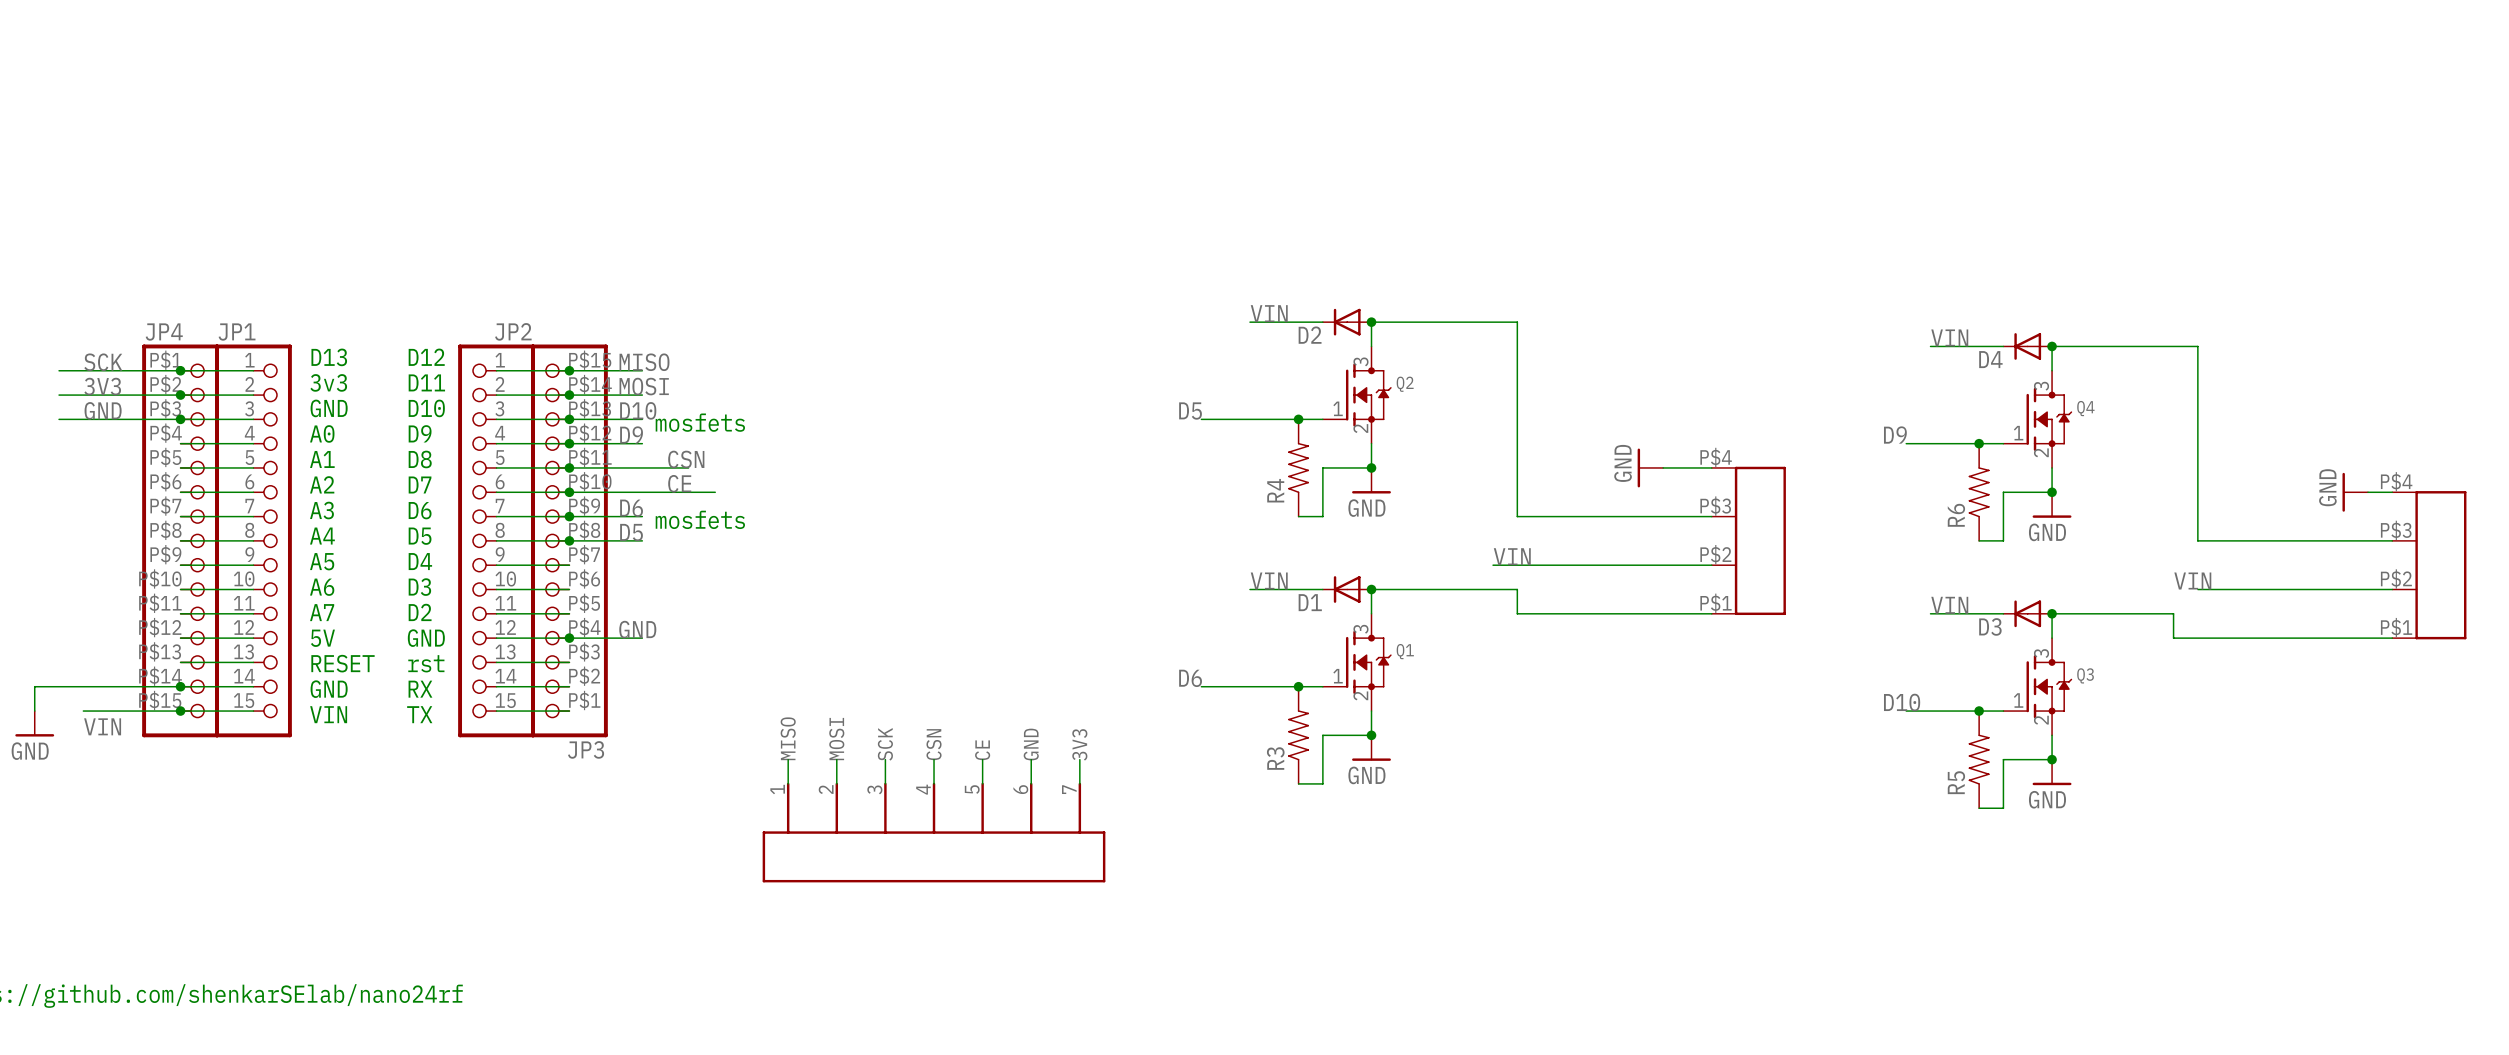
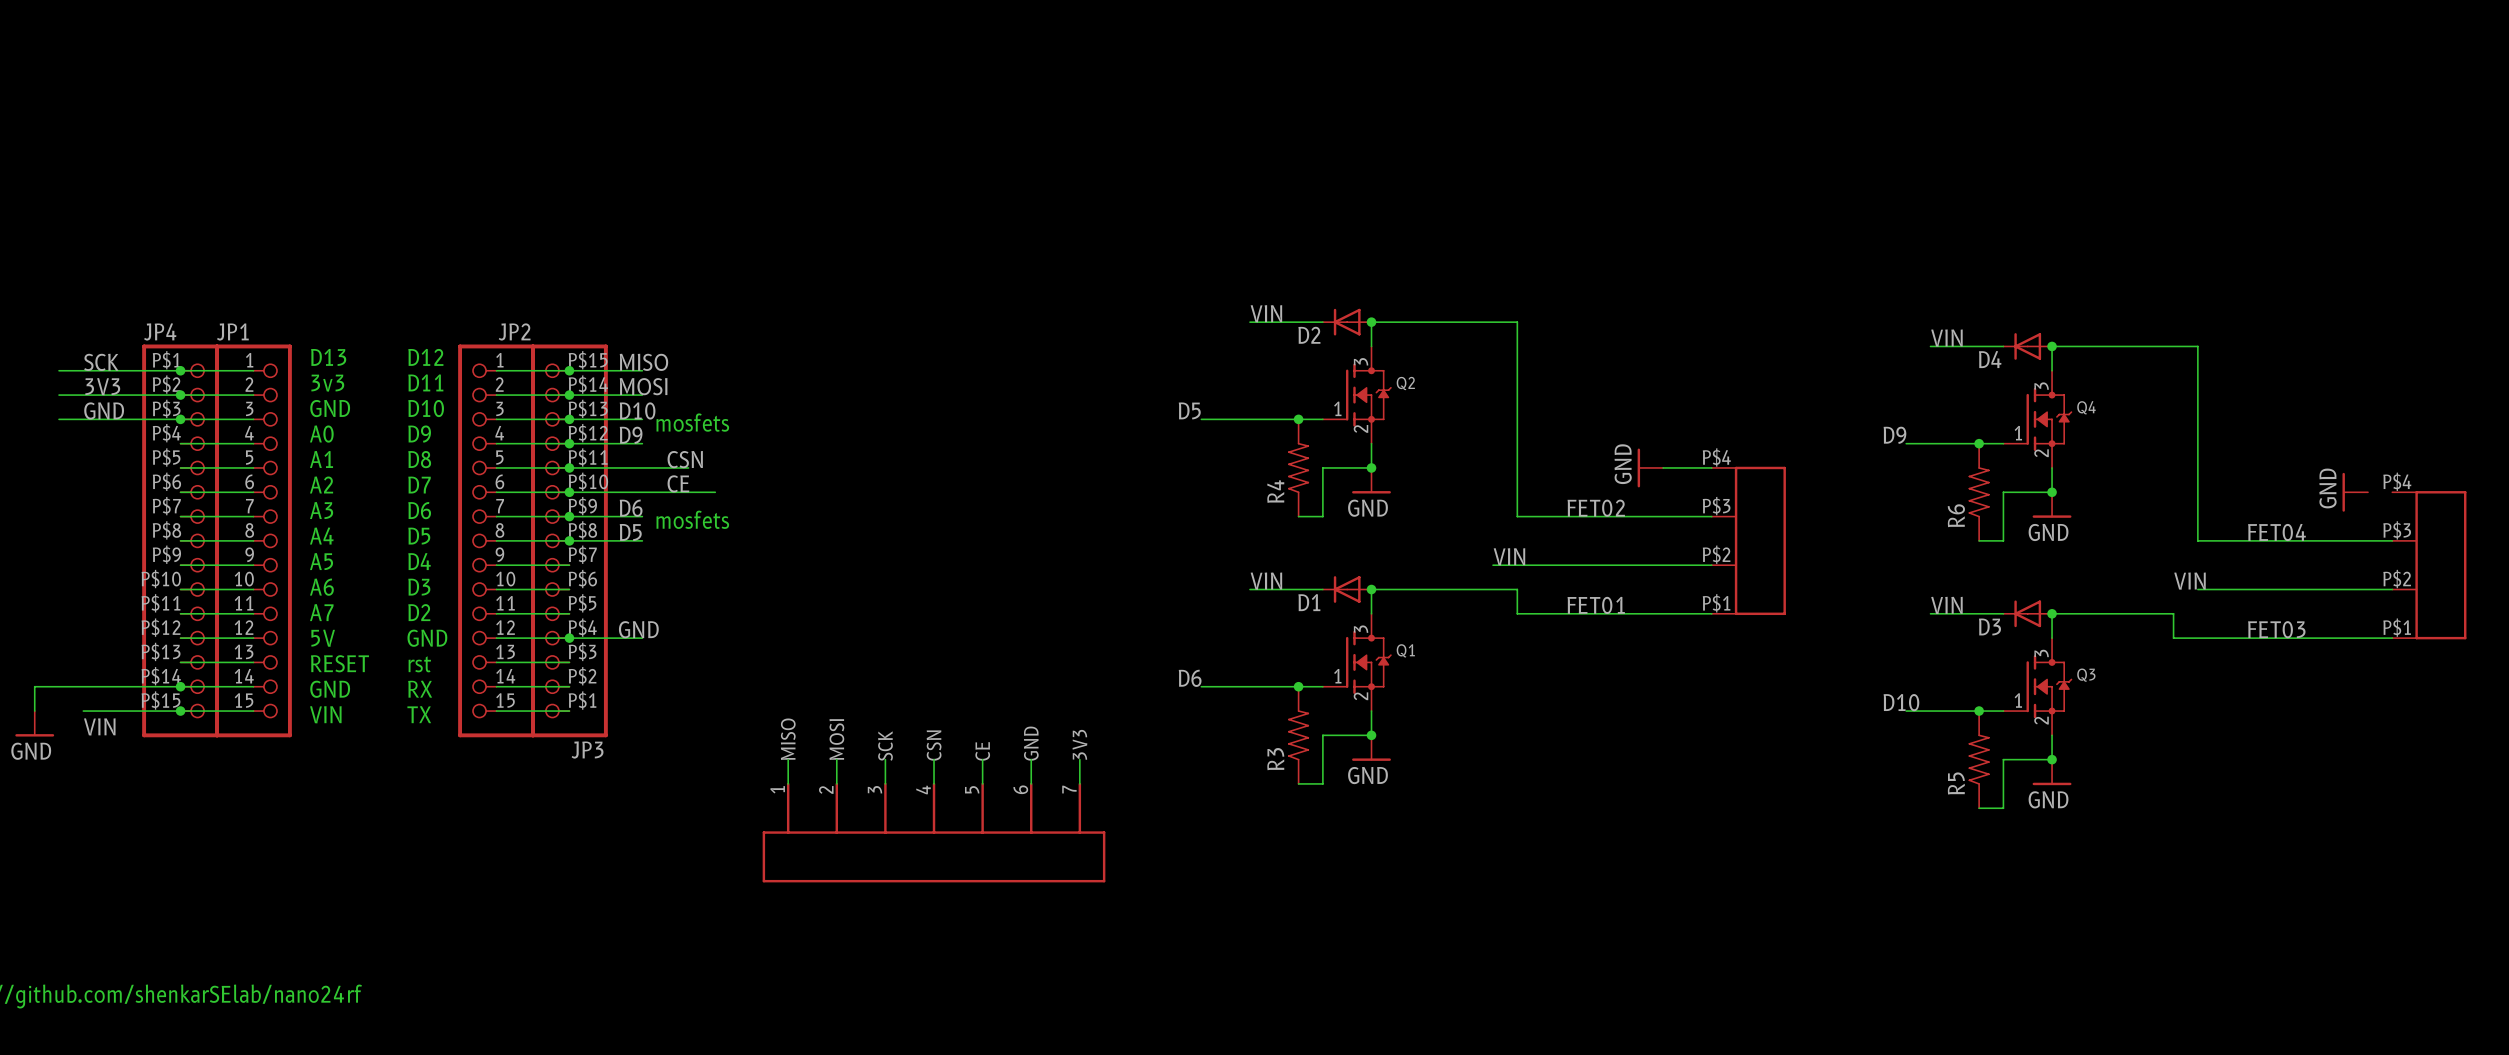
wire: (2368, 492) (2392, 492) -> none
label: none -> FET02 (1596, 508)
label: none -> FET04 (2277, 532)
label: none -> FET01 (1596, 605)
label: none -> FET03 (2276, 629)

